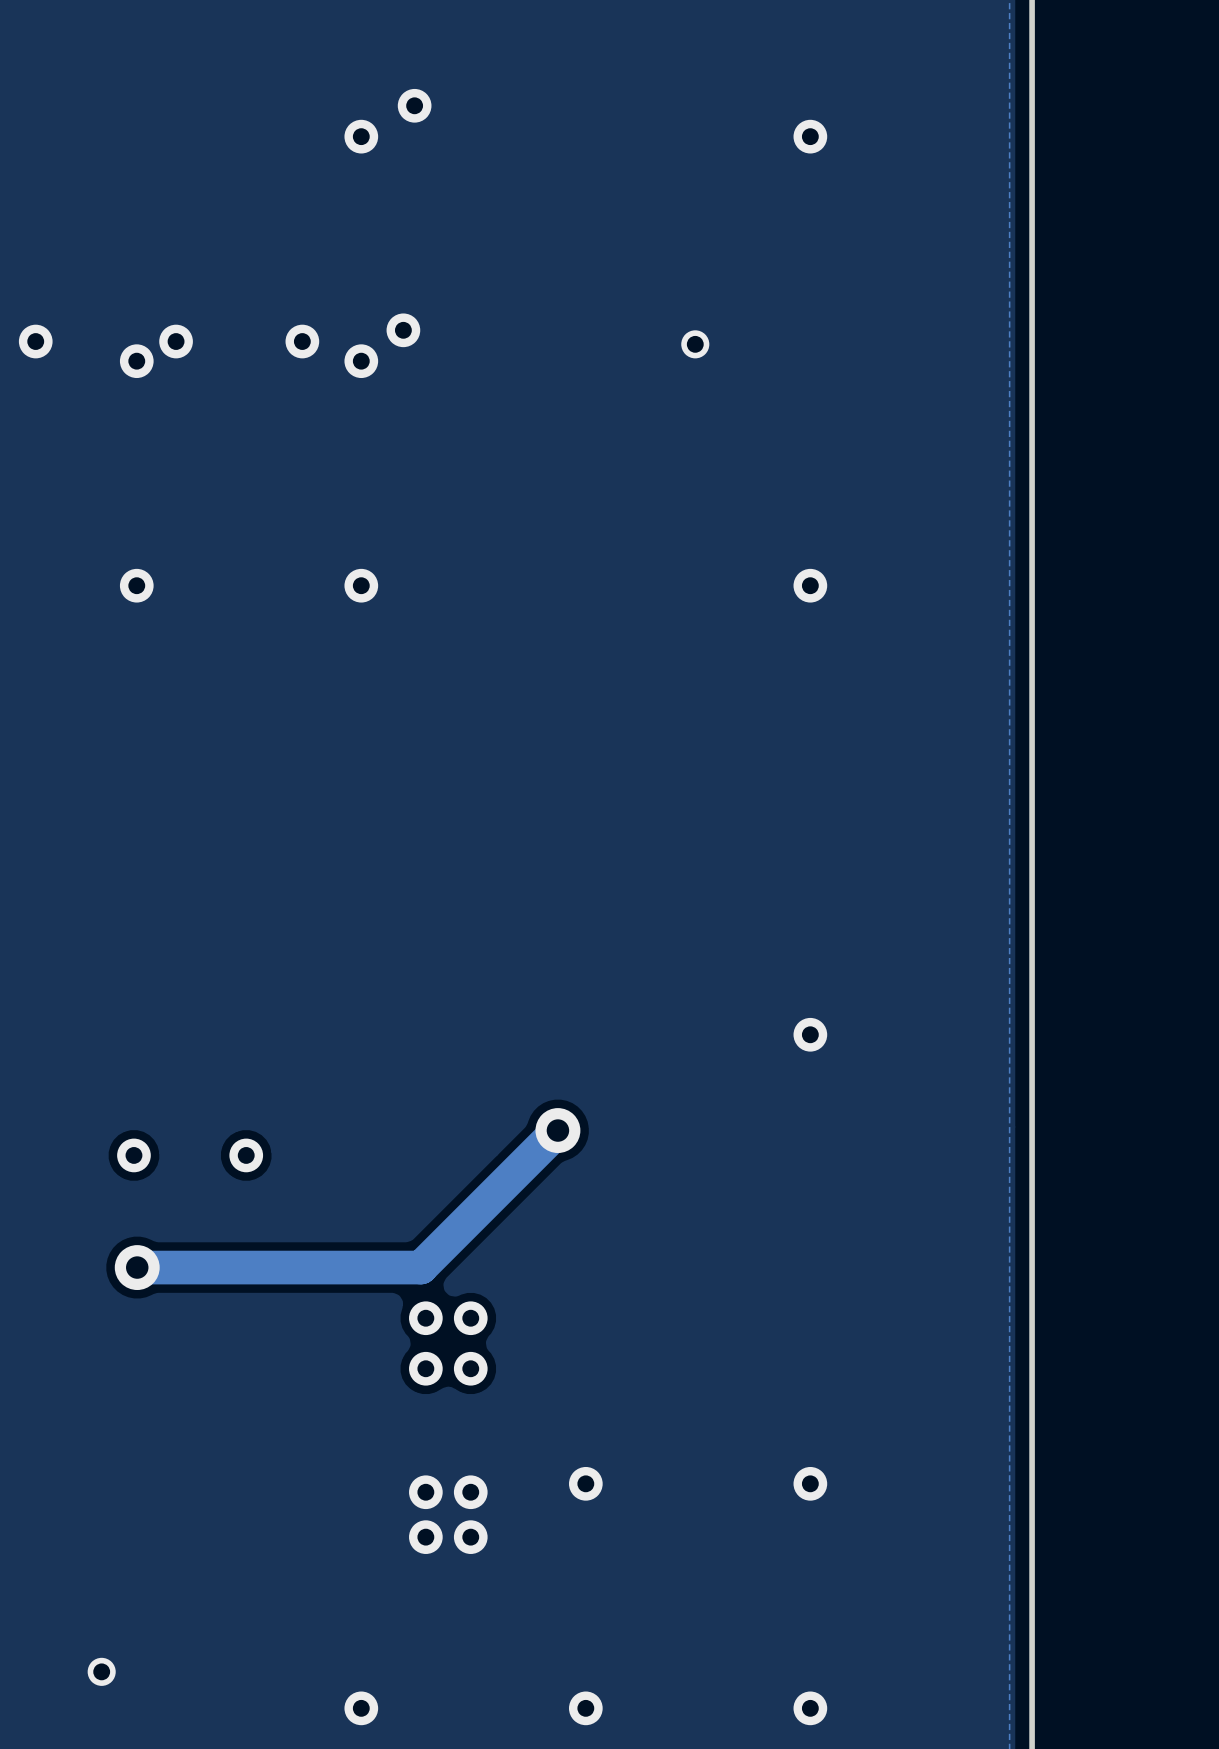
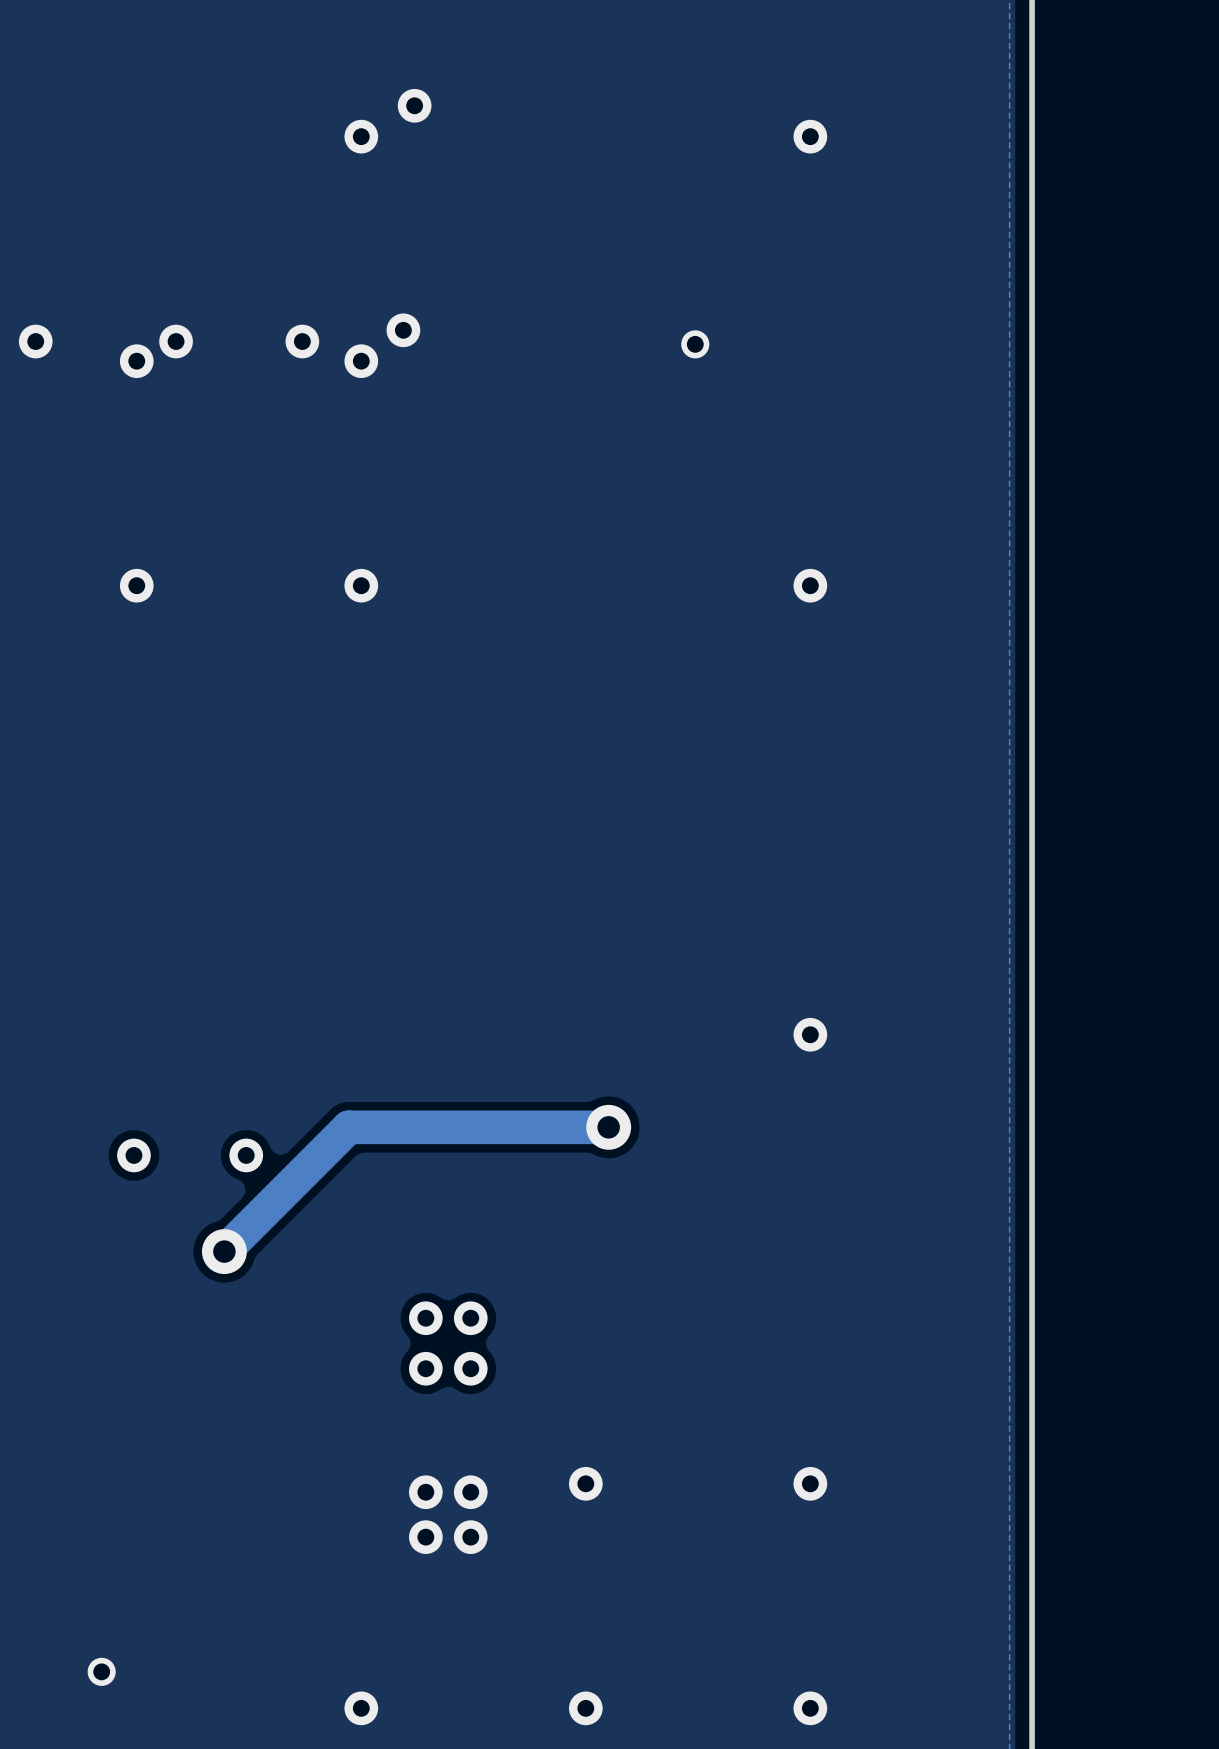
track: none -> (608, 1127) (348, 1127) (224, 1251)
track: (557, 1130) (420, 1267) (137, 1267) -> none
via position: (557, 1130) -> (608, 1127)
via position: (137, 1267) -> (224, 1251)

